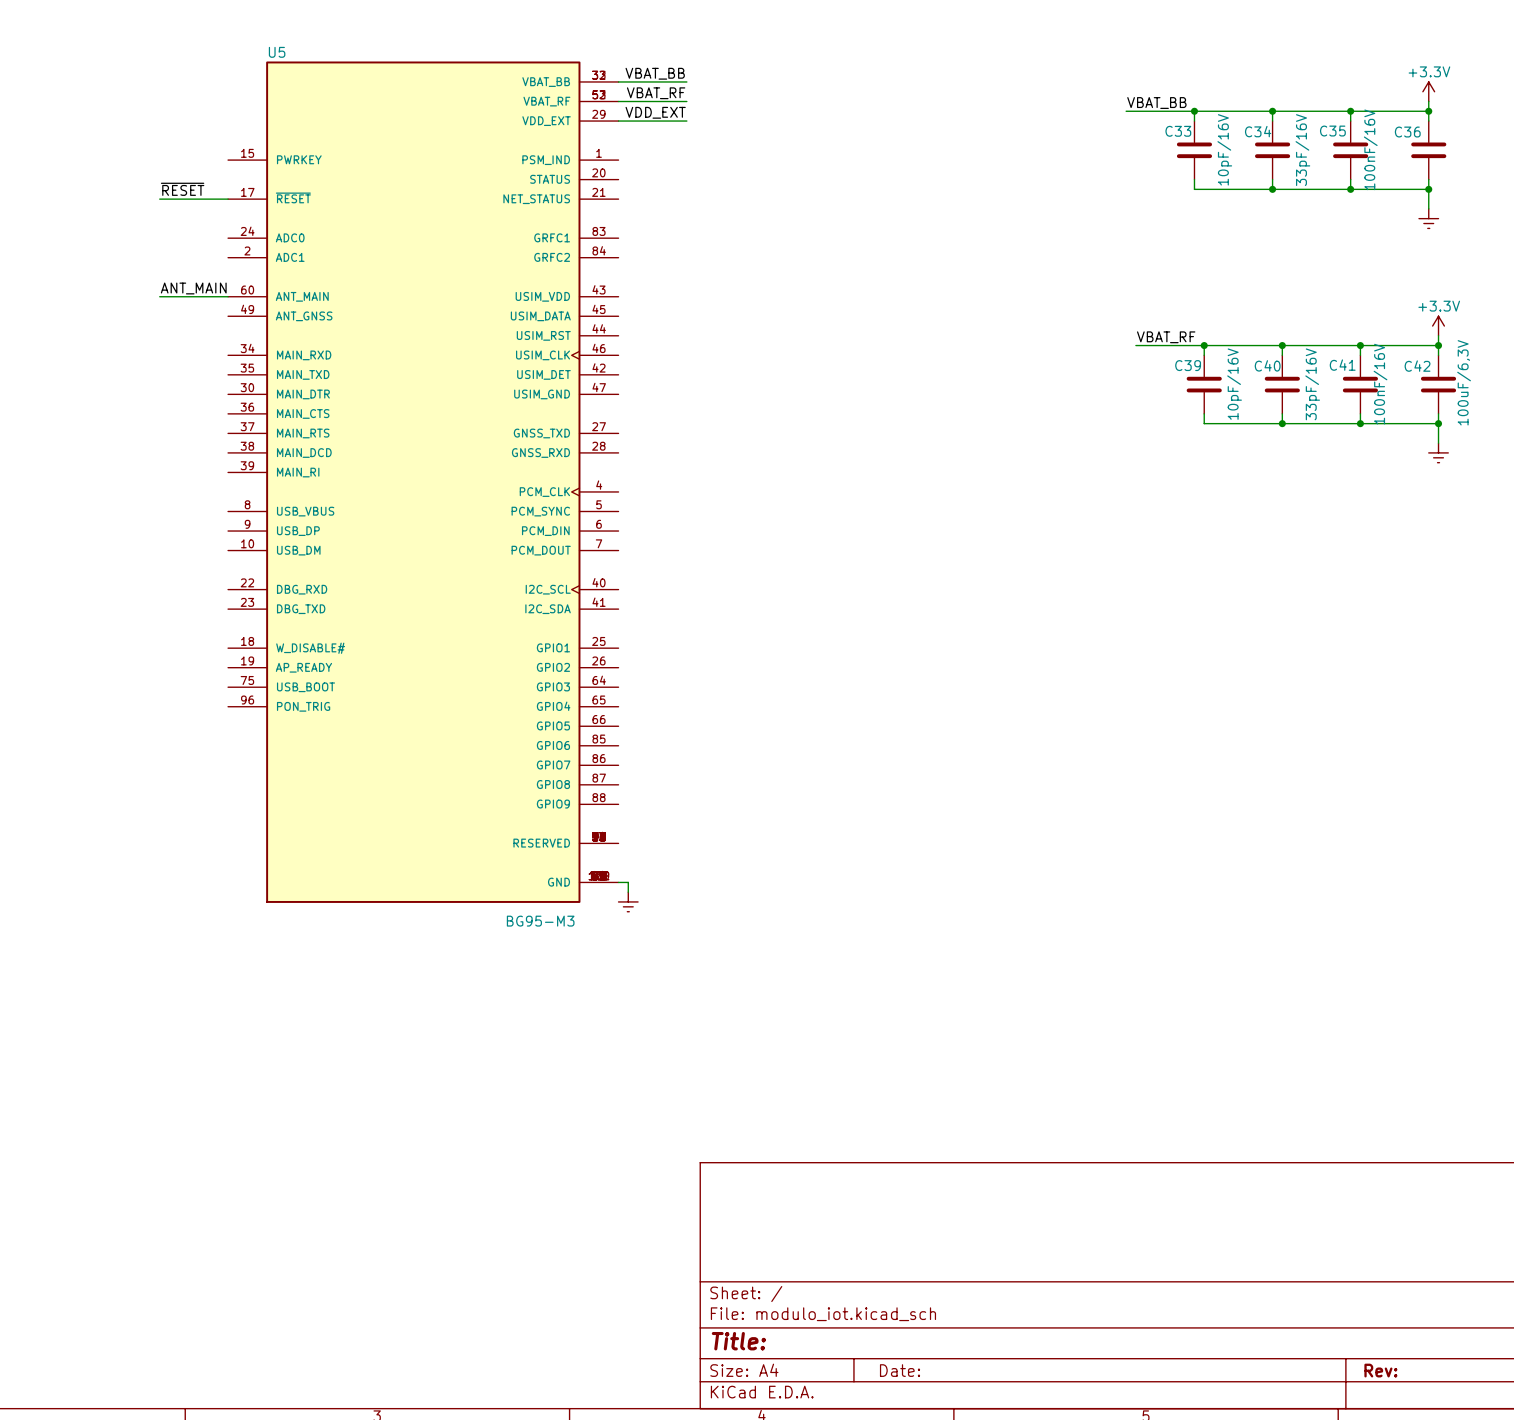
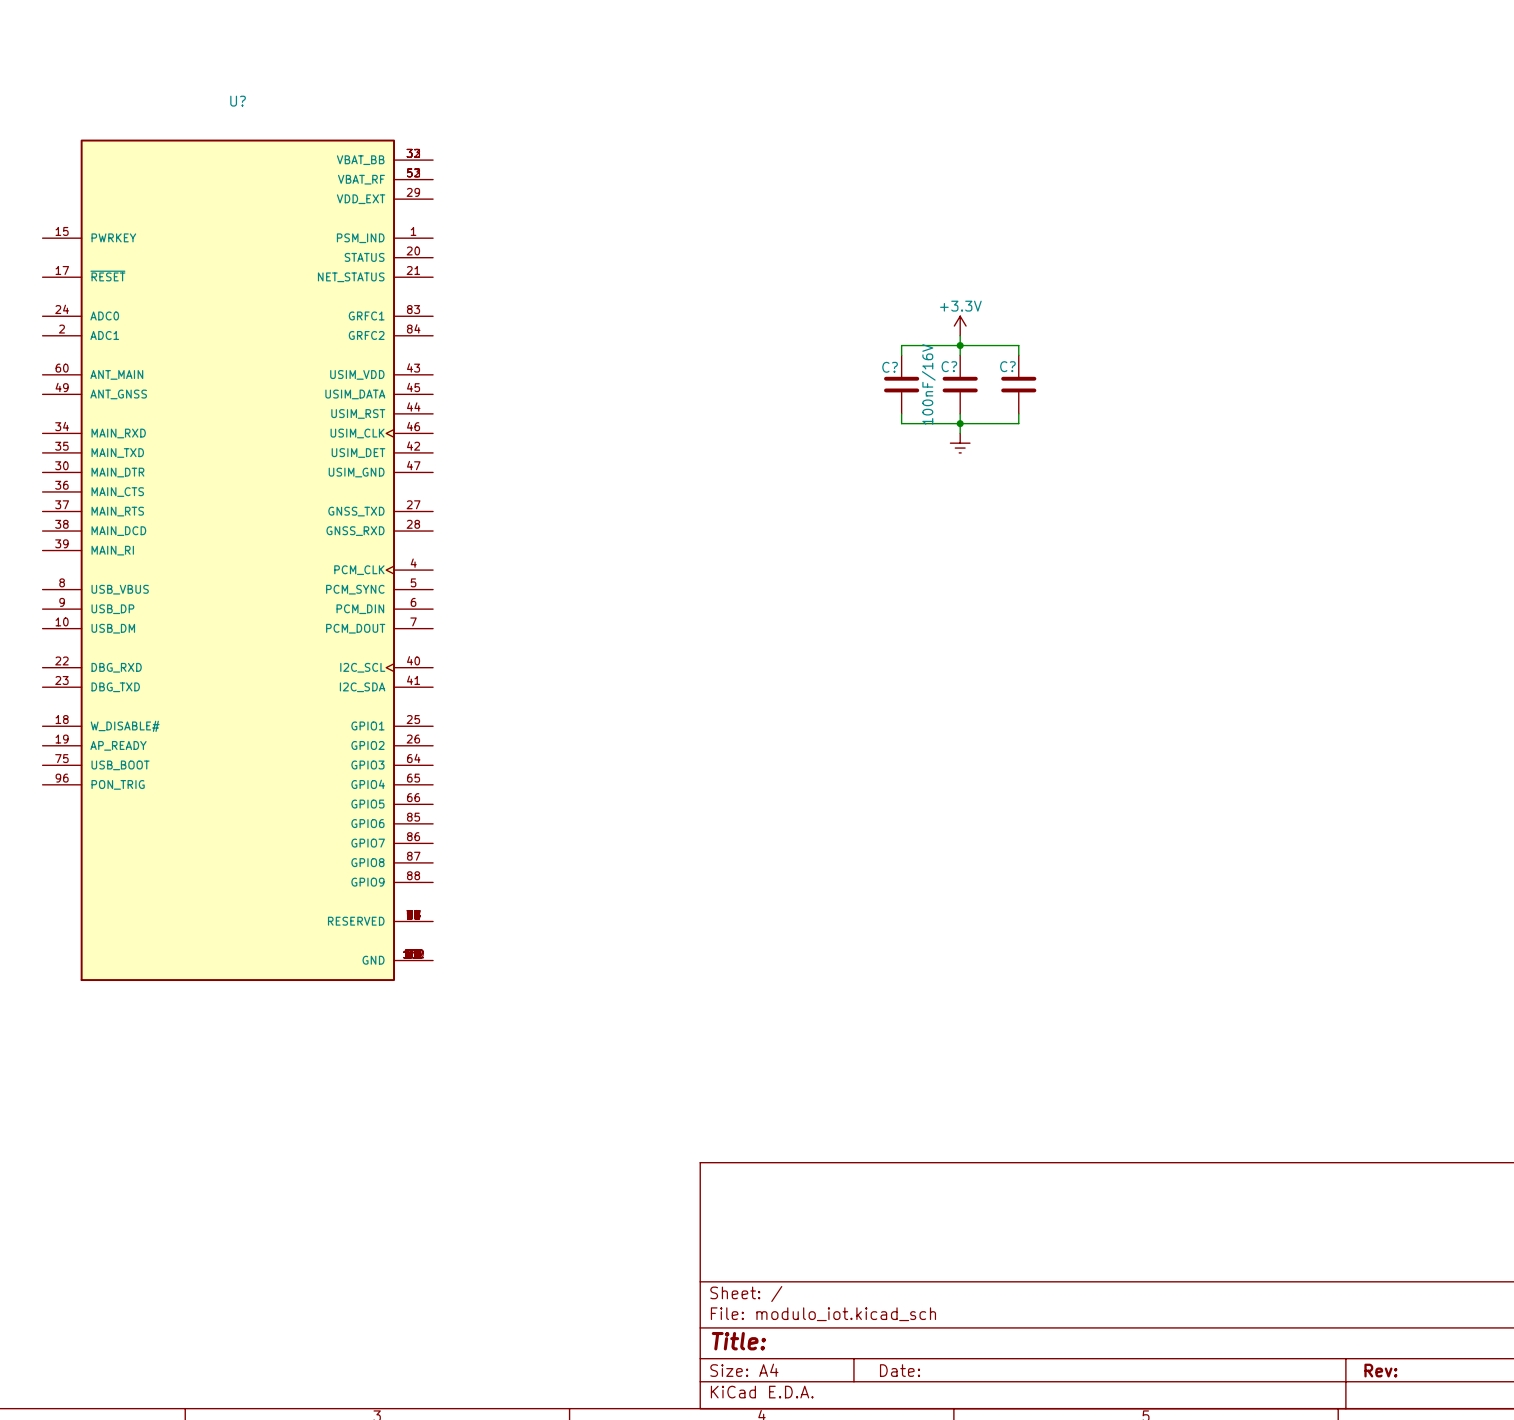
label: VBAT_BB (655, 73) -> none
wire: (618, 81) (686, 81) -> none
power symbol: +3.3V (1428, 91) -> none
label: VBAT_RF (656, 93) -> none
wire: (618, 101) (686, 101) -> none
wire: (1428, 101) (1428, 121) -> none
label: VBAT_BB (1156, 103) -> none
wire: (1126, 111) (1428, 111) -> none
wire: (1194, 111) (1194, 121) -> none
junction: (1194, 111) -> none
wire: (1272, 111) (1272, 121) -> none
junction: (1272, 111) -> none
wire: (1350, 111) (1350, 121) -> none
junction: (1350, 111) -> none
junction: (1428, 111) -> none
label: VDD_EXT (655, 112) -> none
wire: (618, 121) (686, 121) -> none
C33: 10pF/16V (1194, 150) -> none
C34: 33pF/16V (1272, 150) -> none
C35: 100nF/16V (1350, 150) -> none
C36: (1428, 150) -> none
wire: (1194, 179) (1194, 189) (1428, 189) -> none
wire: (1272, 179) (1272, 189) -> none
wire: (1350, 179) (1350, 189) -> none
wire: (1428, 179) (1428, 208) -> none
label: ~{RESET} (182, 189) -> none
junction: (1272, 189) -> none
junction: (1350, 189) -> none
junction: (1428, 189) -> none
power symbol: (1428, 218) -> none
label: ANT_MAIN (193, 288) -> none
power symbol: none -> +3.3V (960, 326)
power symbol: +3.3V (1438, 326) -> none
wire: none -> (960, 335) (960, 355)
wire: (1438, 335) (1438, 355) -> none
label: VBAT_RF (1166, 337) -> none
junction: none -> (960, 345)
wire: (1135, 345) (1438, 345) -> none
wire: (1204, 345) (1204, 355) -> none
junction: (1204, 345) -> none
wire: (1282, 345) (1282, 355) -> none
junction: (1282, 345) -> none
wire: (1360, 345) (1360, 355) -> none
junction: (1360, 345) -> none
junction: (1438, 345) -> none
wire: none -> (901, 355) (901, 345) (1018, 345) (1018, 355)
C?: none -> 100nF/16V (901, 384)
C?: none -> (960, 384)
C?: none -> (1018, 384)
C39: 10pF/16V (1204, 384) -> none
C40: 33pF/16V (1282, 384) -> none
C41: 100nF/16V (1360, 384) -> none
C42: 100uF/6,3V (1438, 384) -> none
wire: none -> (901, 413) (901, 423) (1018, 423) (1018, 413)
wire: none -> (960, 413) (960, 433)
wire: (1204, 413) (1204, 423) (1438, 423) -> none
wire: (1282, 413) (1282, 423) -> none
wire: (1360, 413) (1360, 423) -> none
wire: (1438, 413) (1438, 443) -> none
junction: none -> (960, 423)
junction: (1282, 423) -> none
junction: (1360, 423) -> none
junction: (1438, 423) -> none
power symbol: none -> (960, 443)
power symbol: (1438, 452) -> none
U5: BG95-M3 (423, 482) -> none
U?: none -> (237, 560)
wire: (618, 882) (628, 882) (628, 892) -> none
power symbol: (628, 901) -> none

